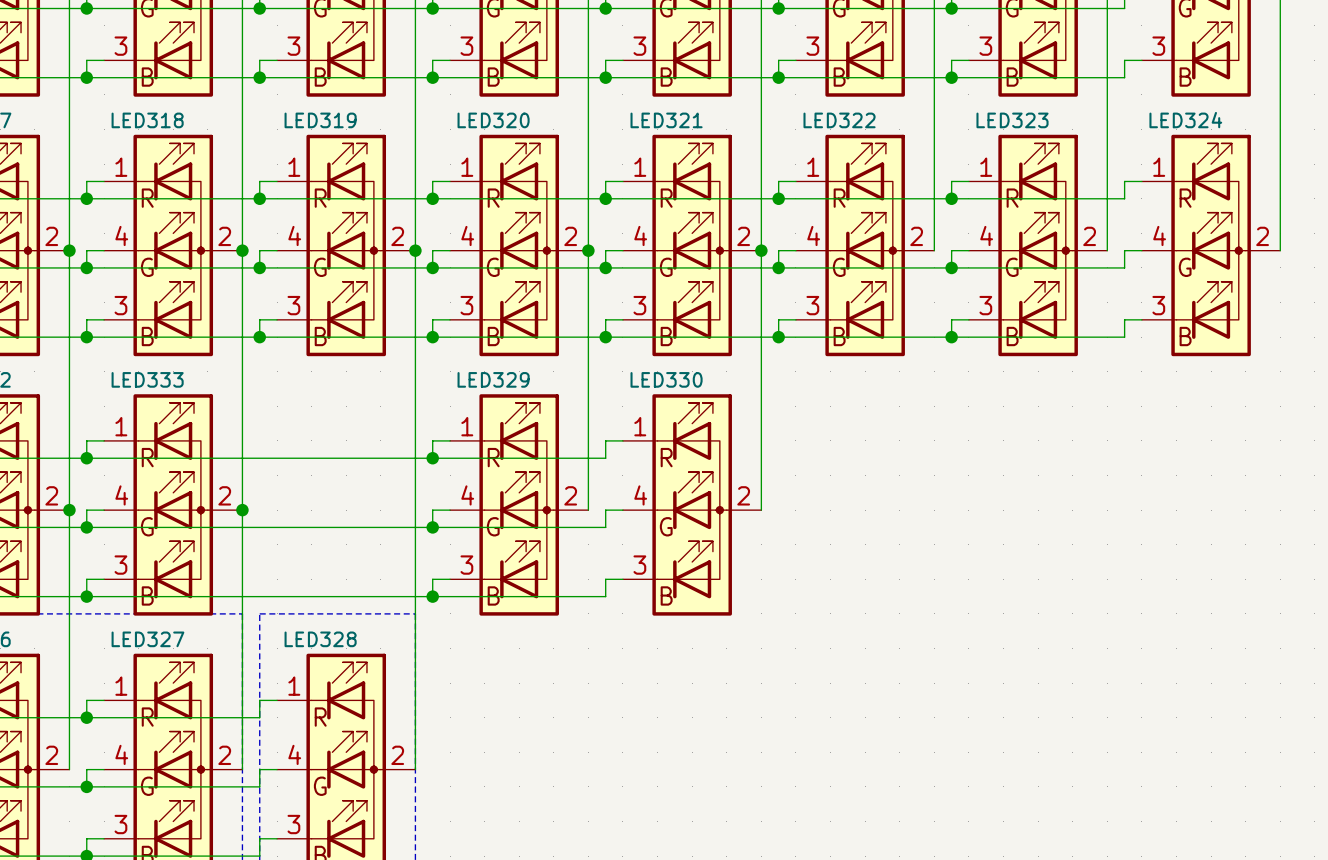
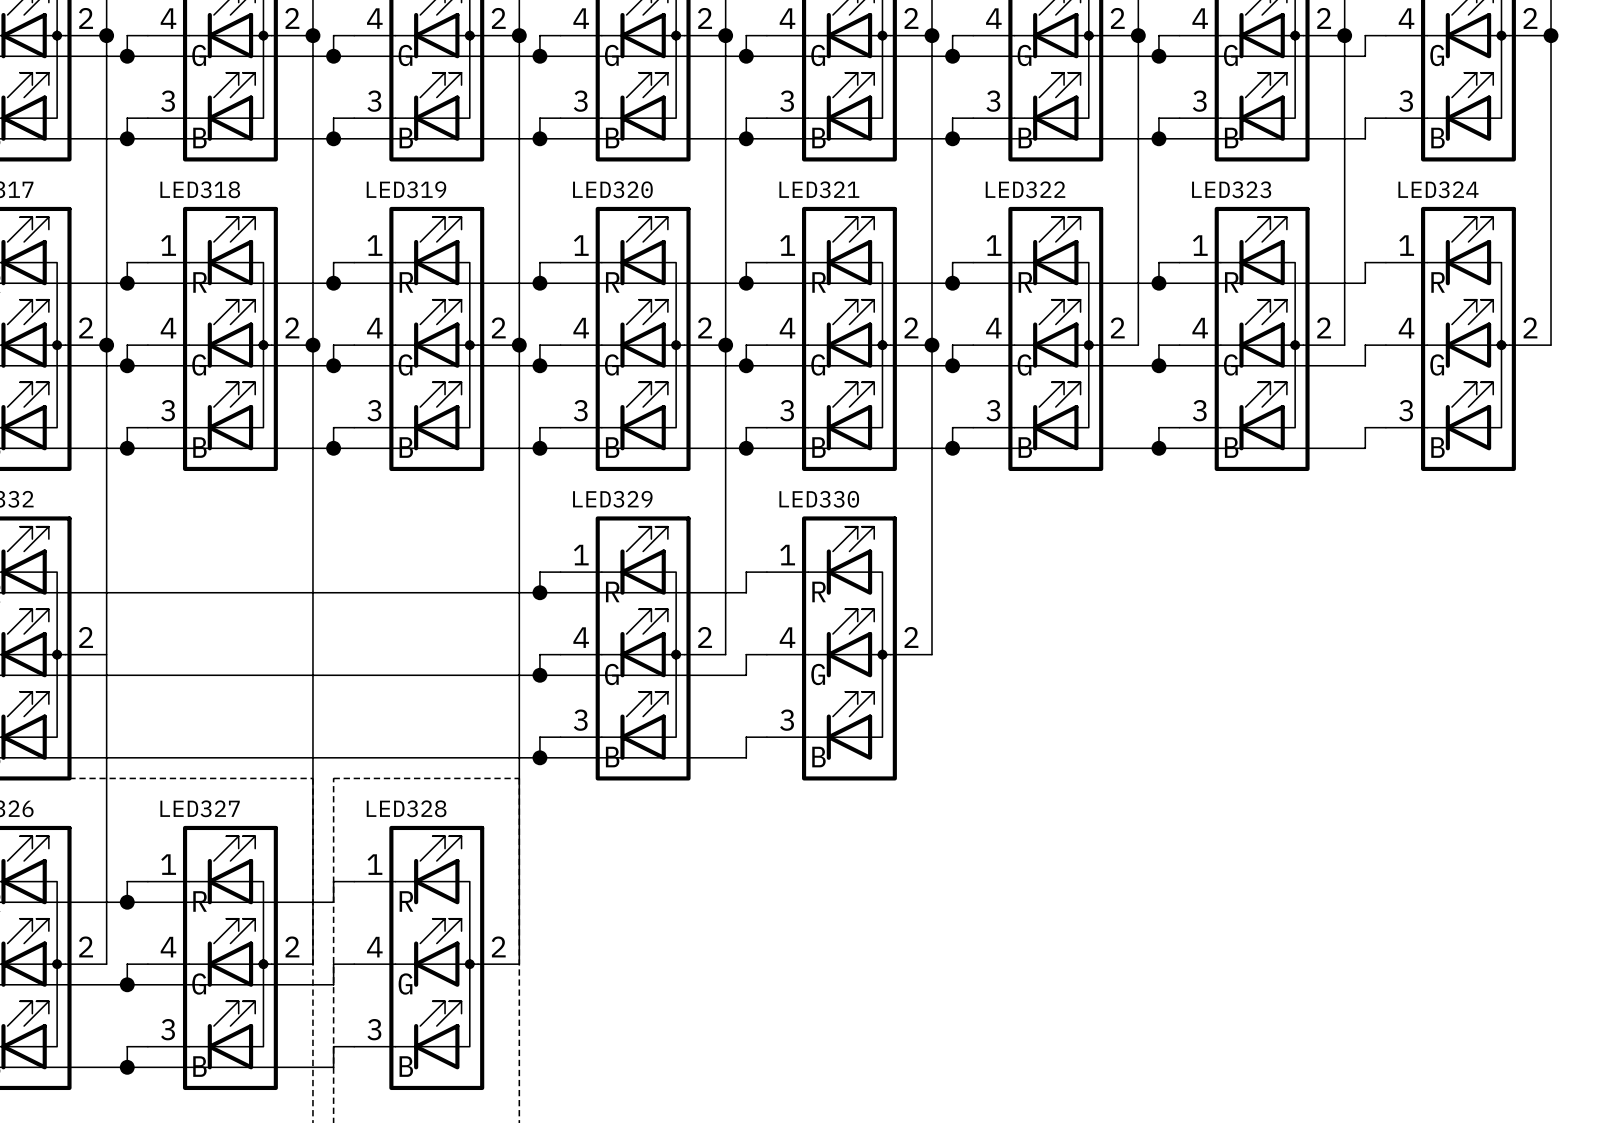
wire: (104, 440) (86, 440) (86, 458) -> none
junction: (86, 458) -> none
LED333: (173, 504) -> none
junction: (69, 510) -> none
wire: (104, 510) (86, 510) (86, 527) -> none
junction: (242, 510) -> none
junction: (86, 527) -> none
wire: (104, 579) (86, 579) (86, 596) -> none
junction: (86, 596) -> none

